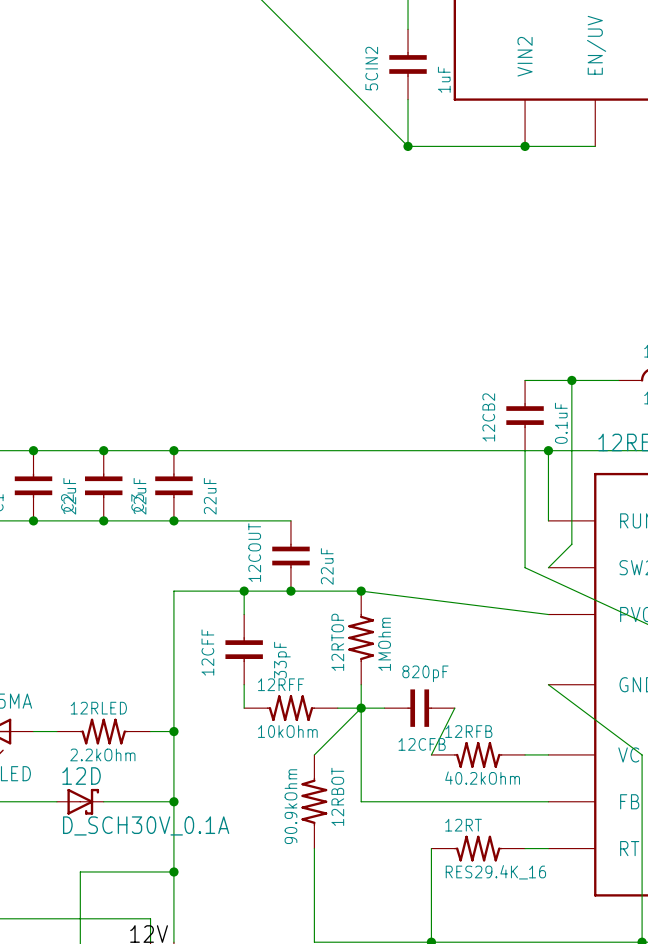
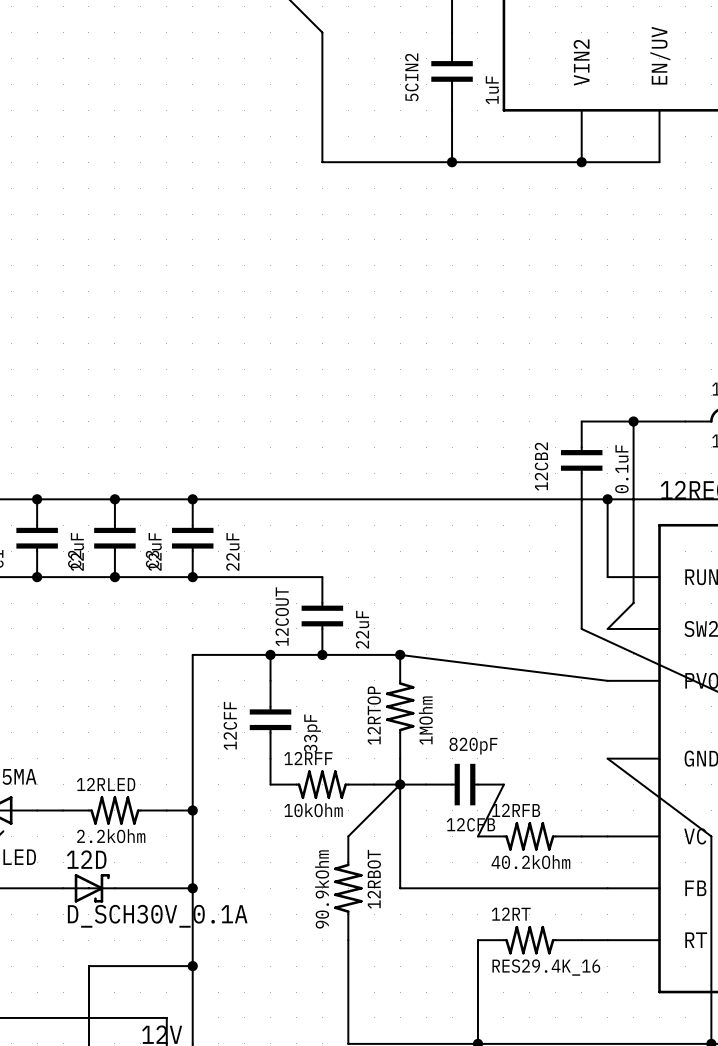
wire: (290, 29) (408, 146) -> (322, 32) (322, 162) (452, 162)

